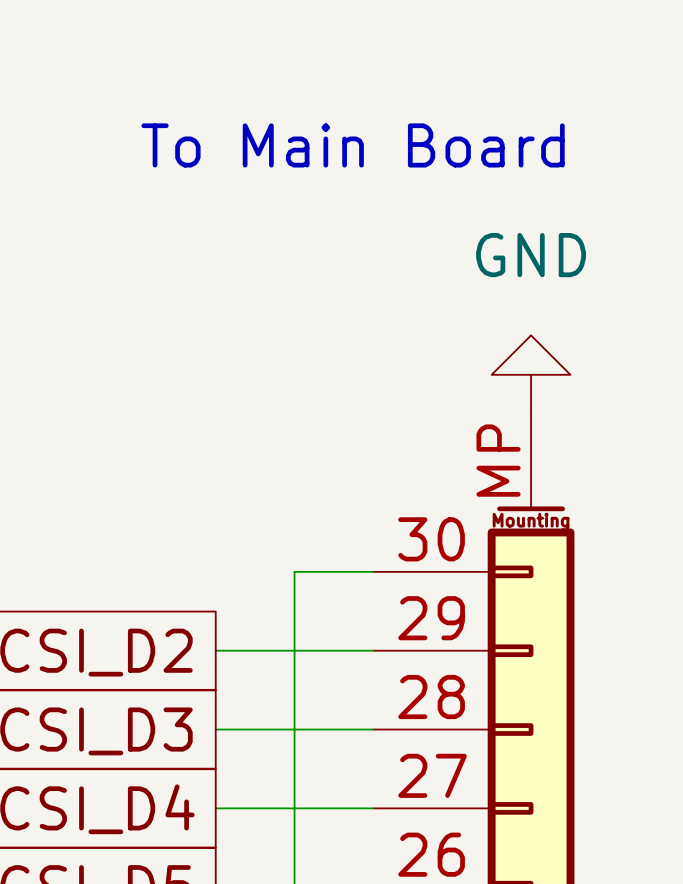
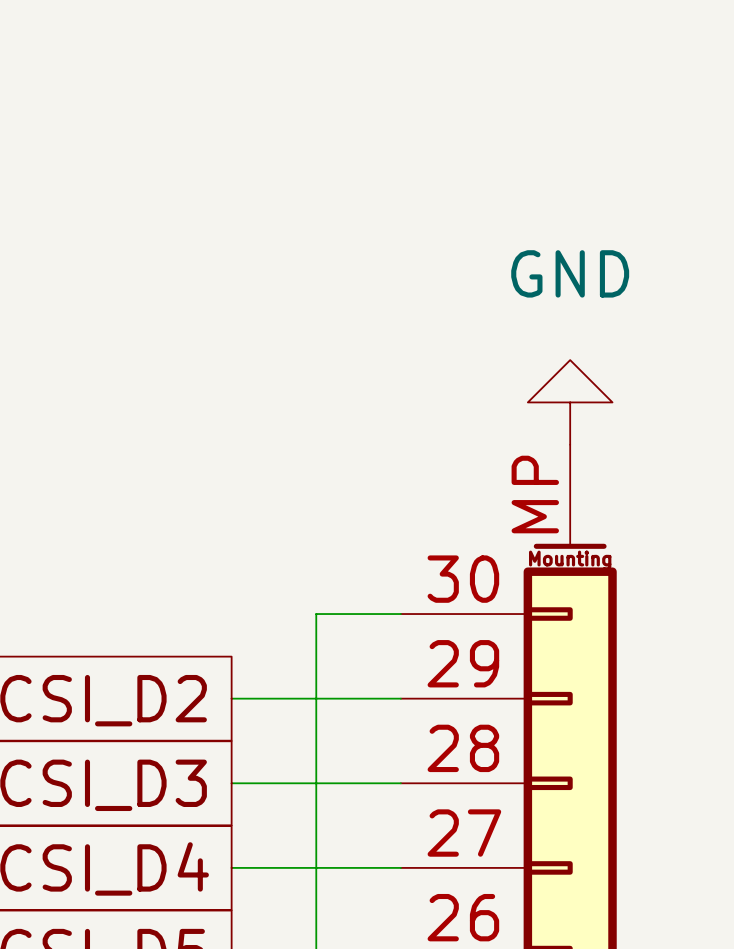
text: To Main Board (353, 145) -> none

